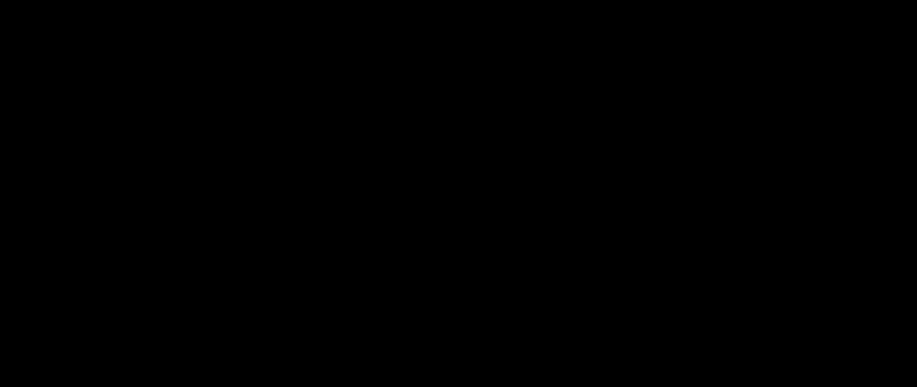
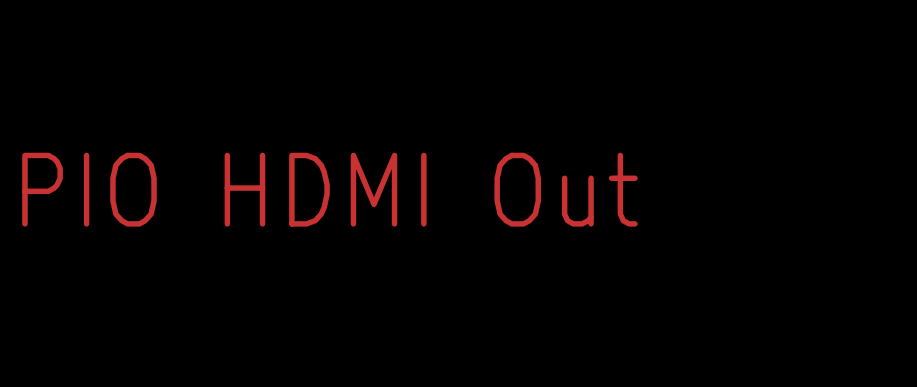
text: none -> PIO HDMI Out (330, 189)

